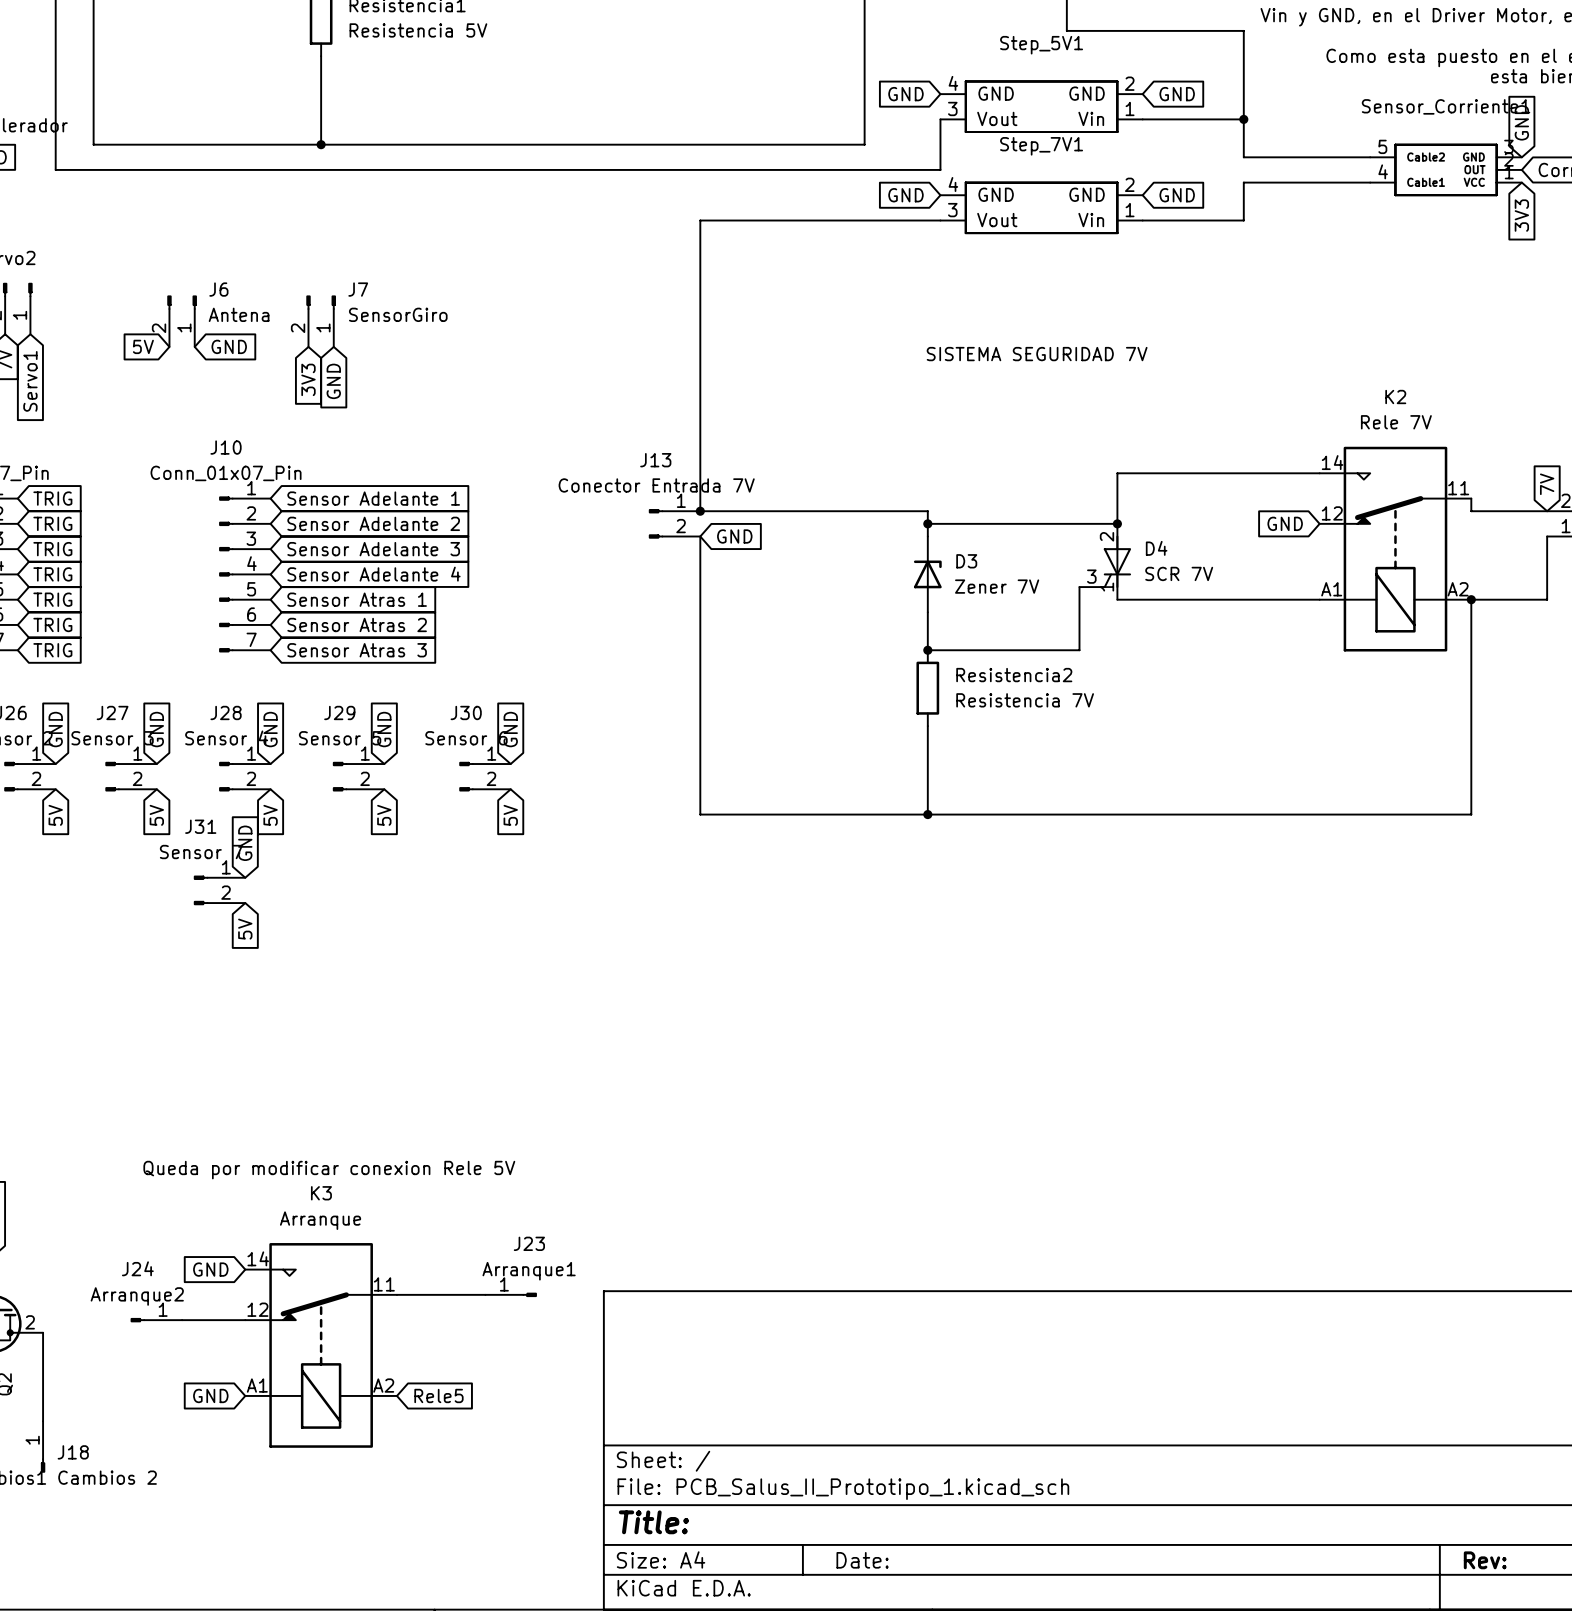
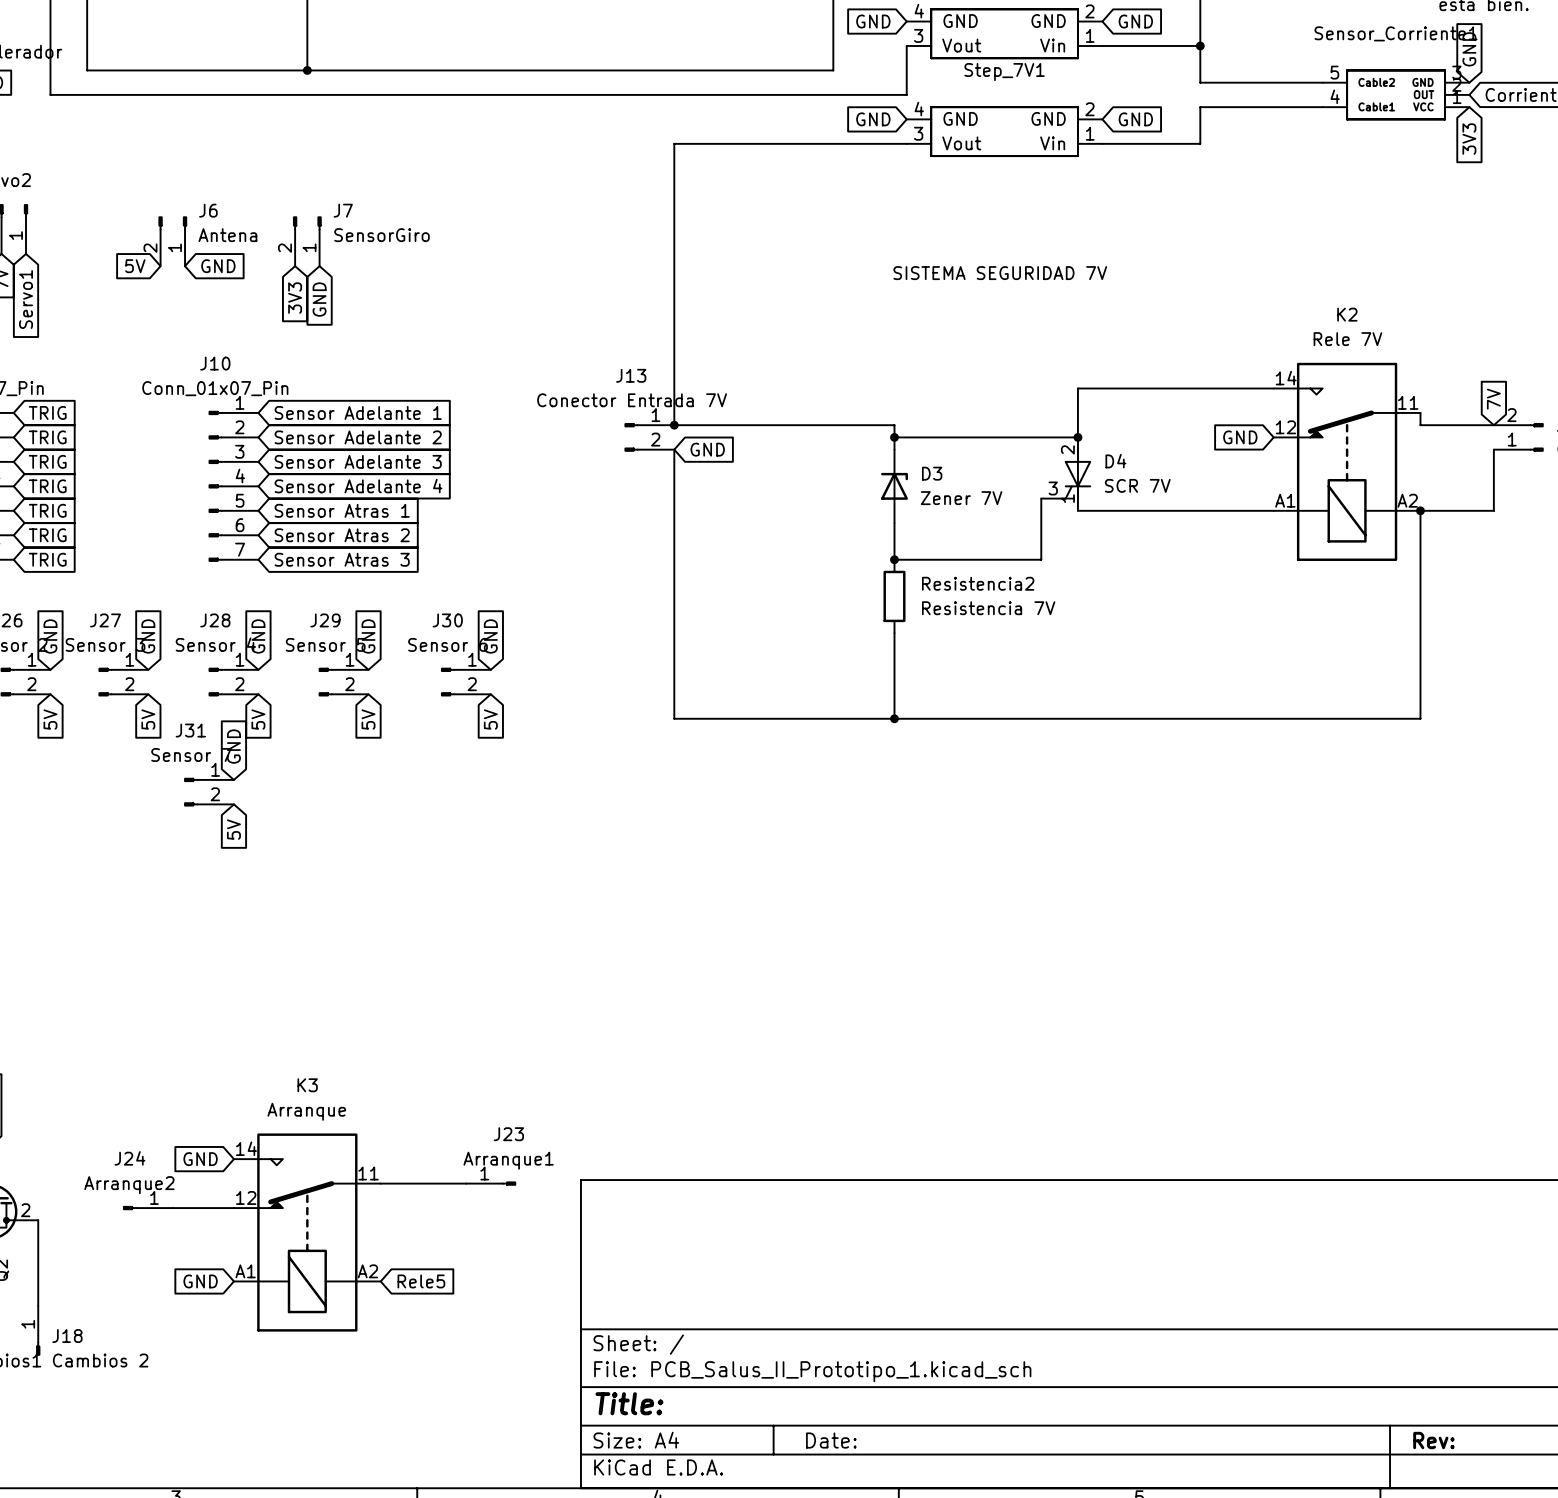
text: Queda por modificar conexion Rele 5V (329, 1170) -> none

